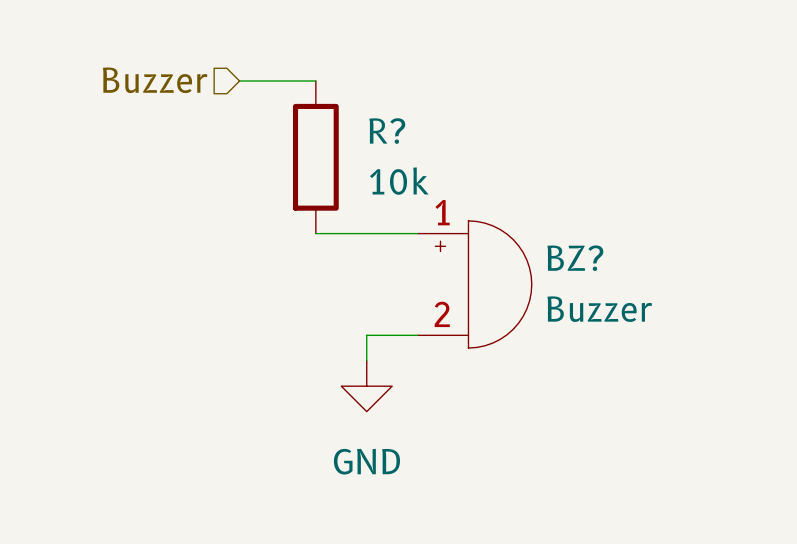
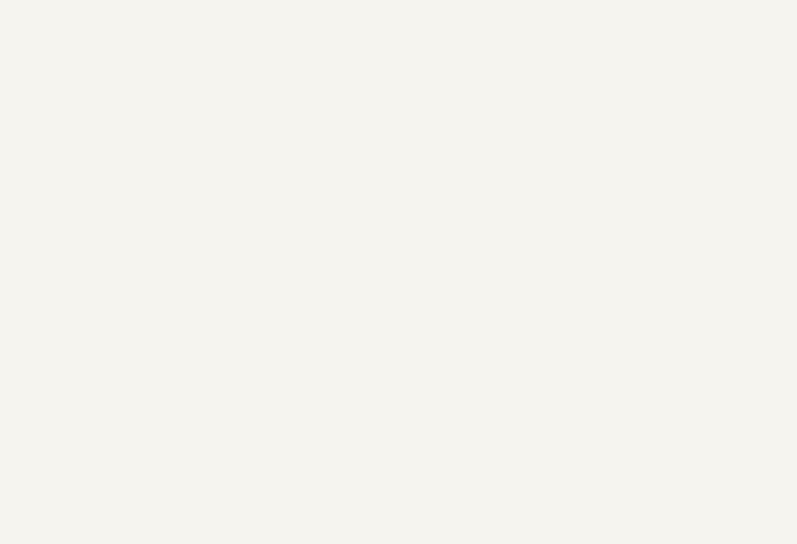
hierarchical label: Buzzer (155, 80) -> none
wire: (239, 81) (315, 81) -> none
R?: 10k (315, 157) -> none
wire: (315, 233) (417, 233) -> none
BZ?: Buzzer (474, 284) -> none
wire: (417, 335) (366, 335) (366, 360) -> none
power symbol: GND (366, 386) -> none

